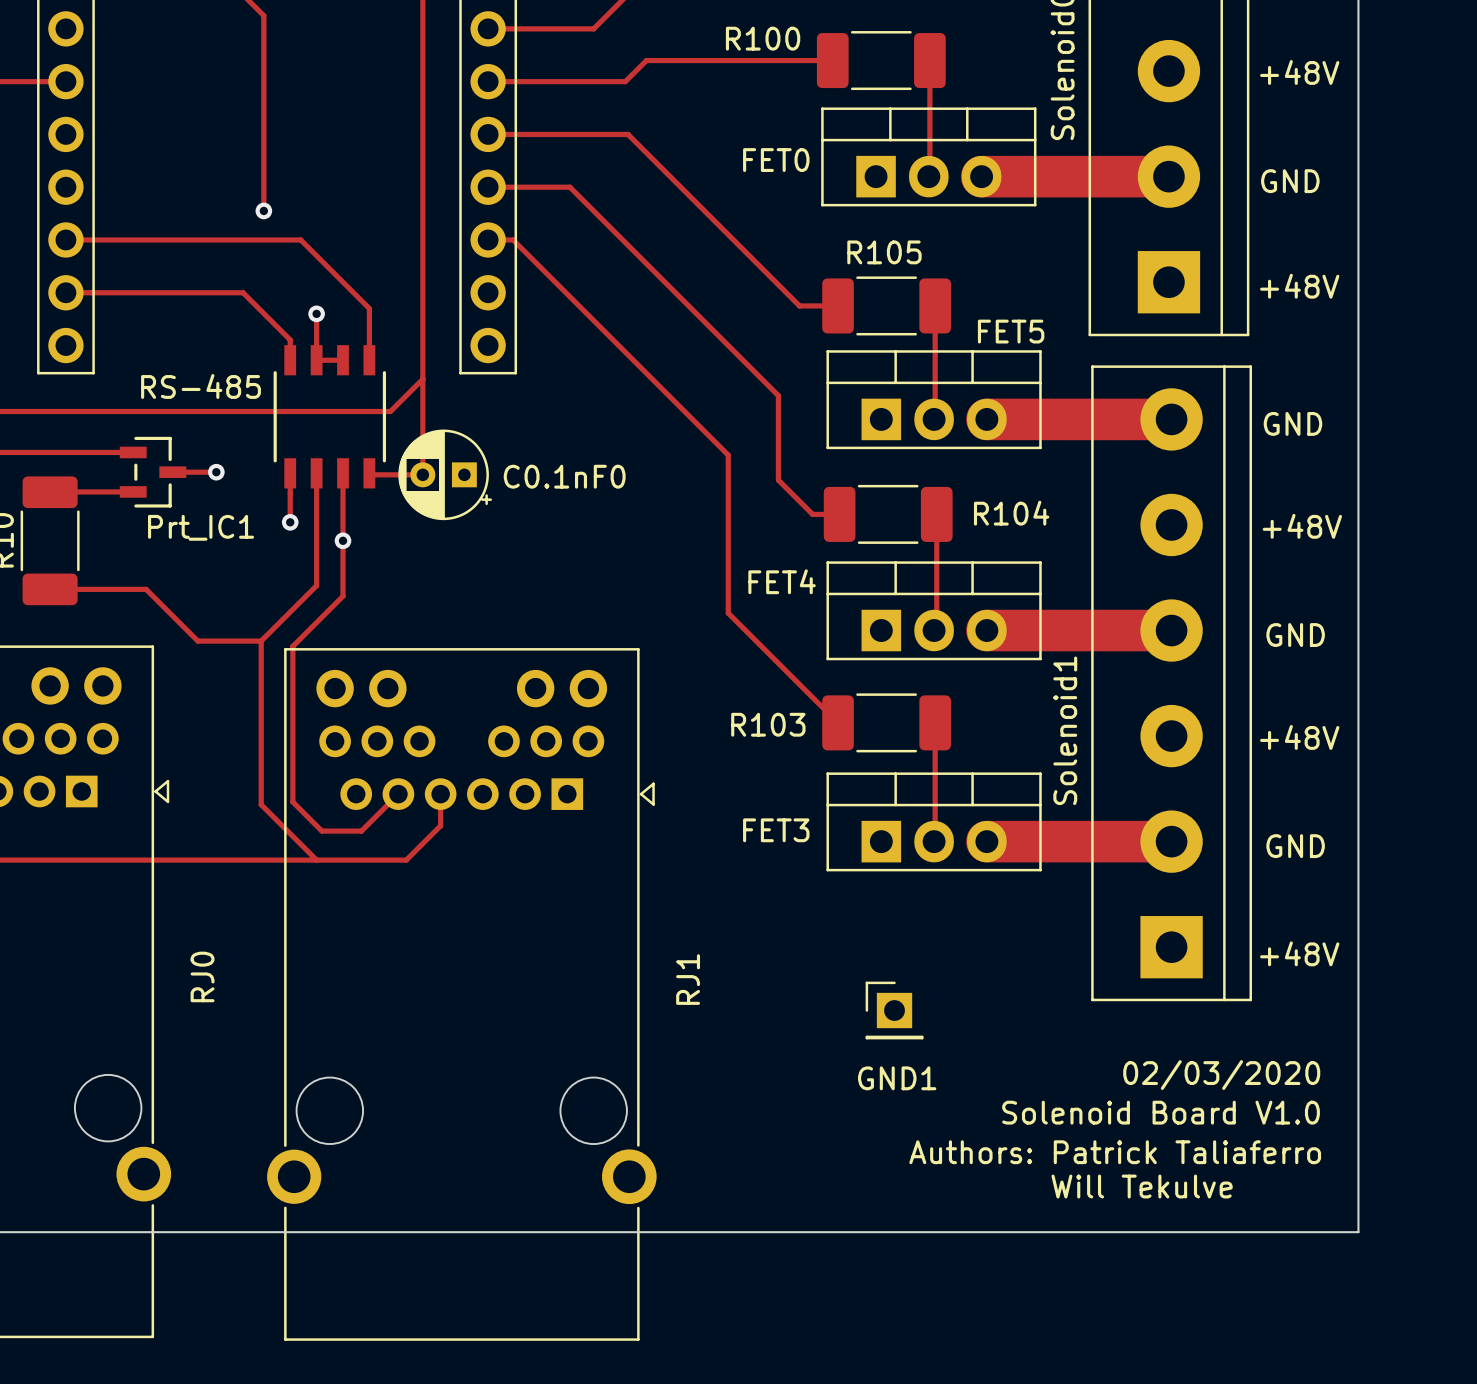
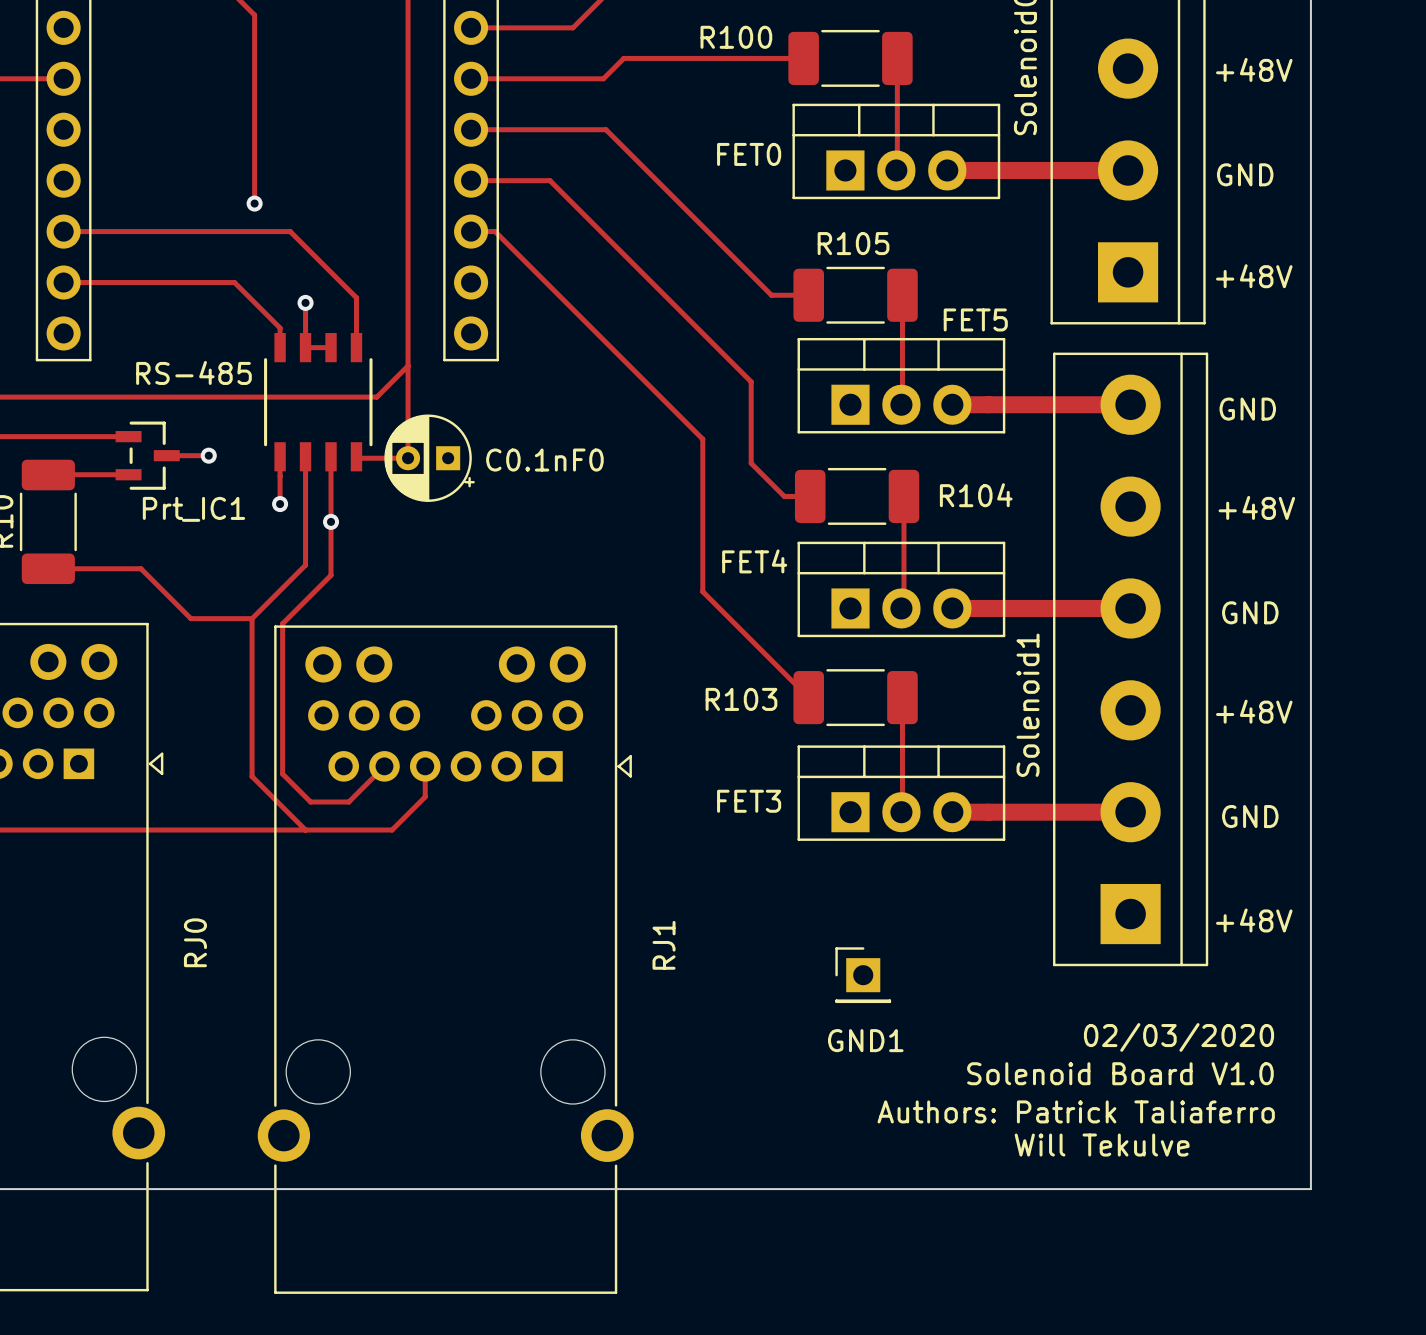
track width: thick (981, 176) (1168, 176) -> thin (947, 170) (1128, 170)
track width: thick (986, 419) (1171, 419) -> thin (952, 404) (1130, 404)
track width: thick (986, 630) (1171, 630) -> thin (952, 608) (1130, 608)
track width: thick (986, 841) (1171, 841) -> thin (952, 812) (1130, 812)

